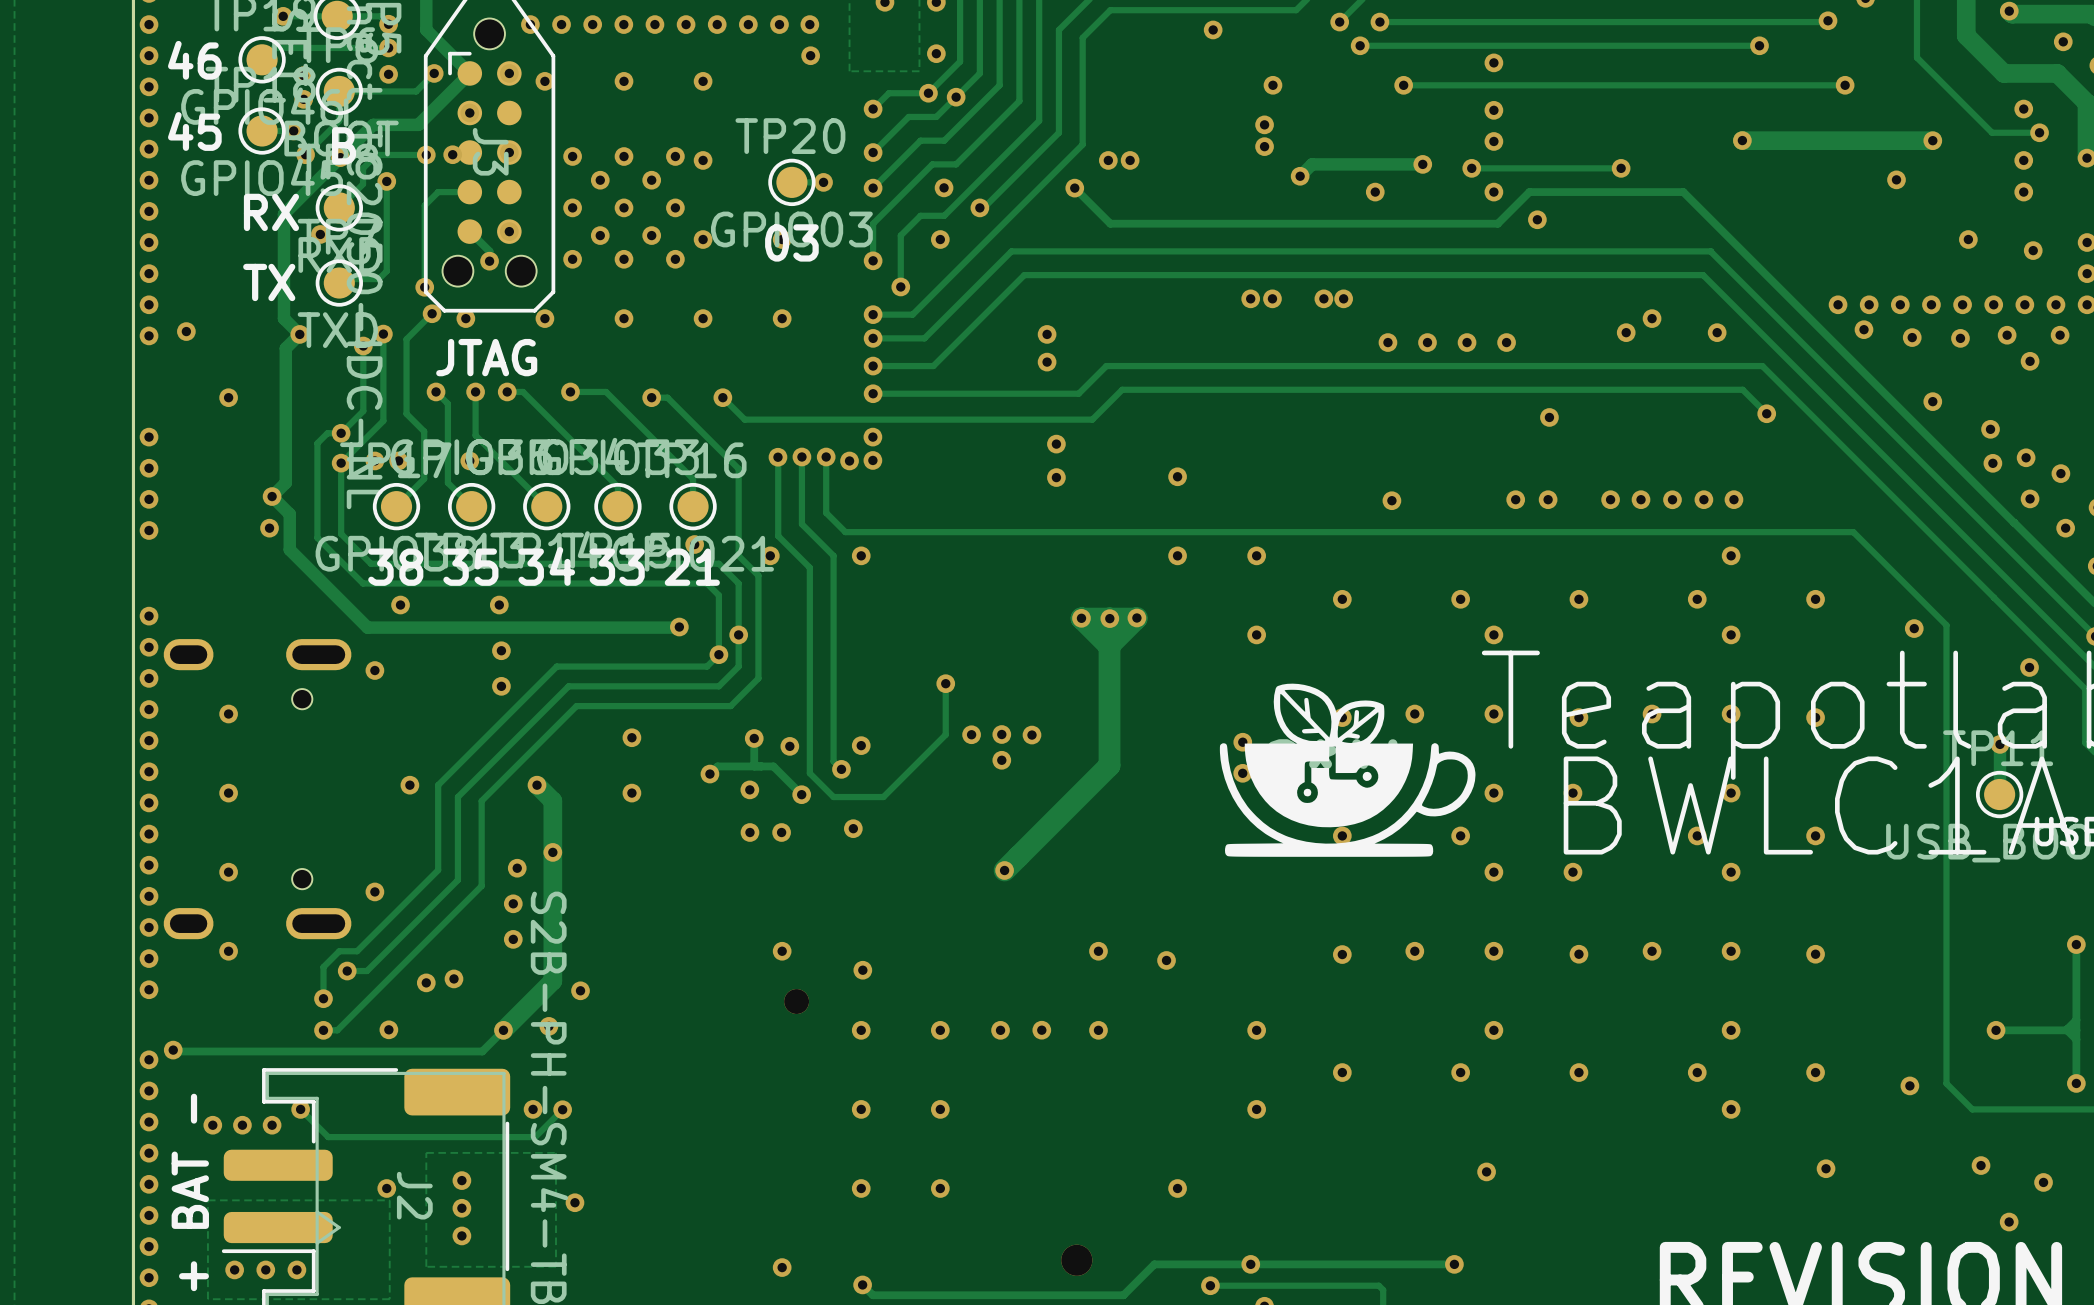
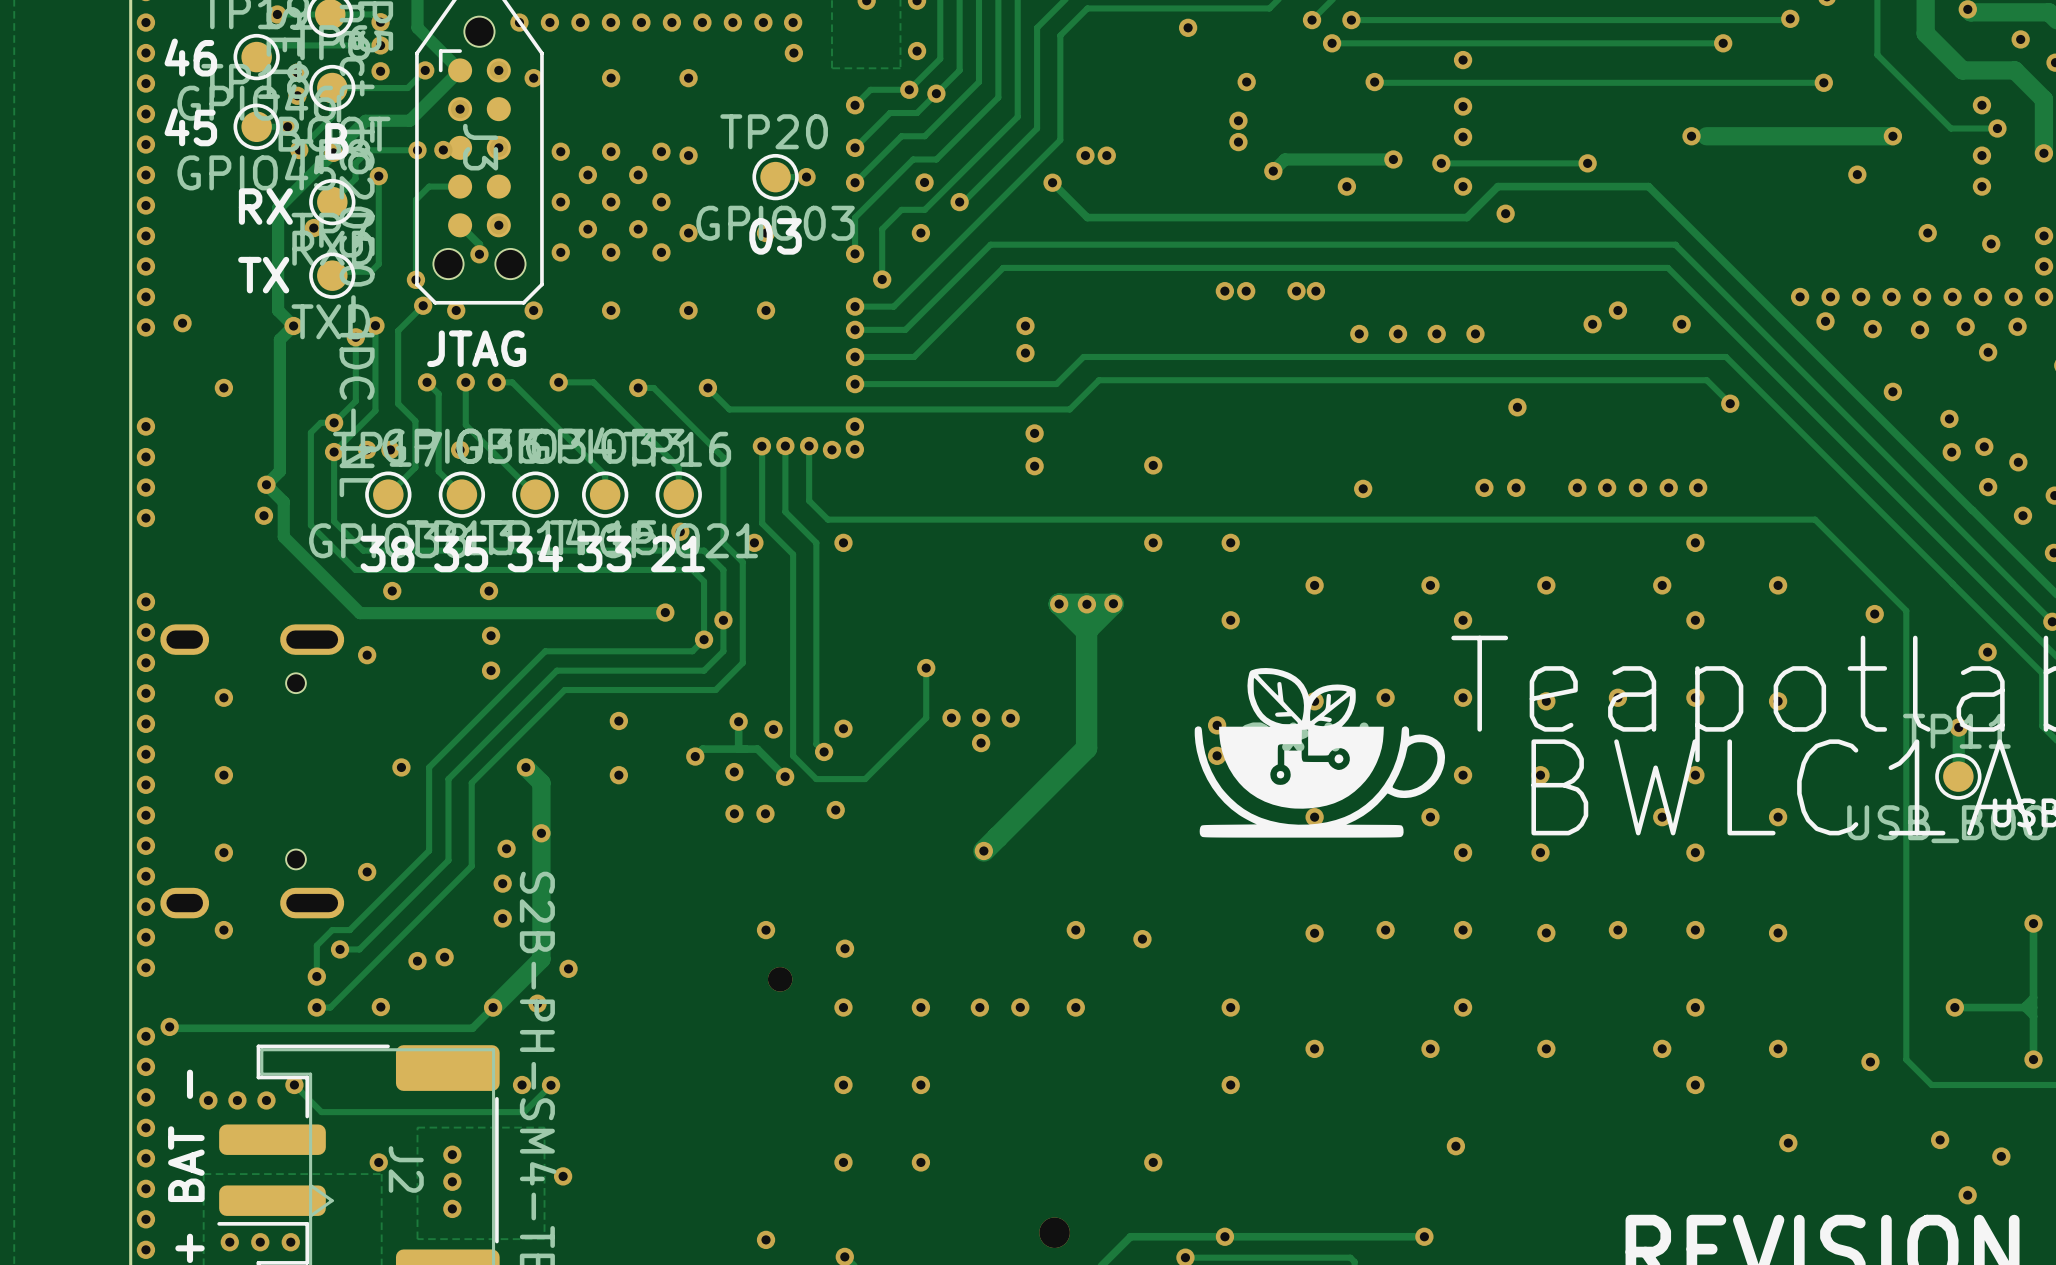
track: (1845, 85) (1403, 85) -> (1823, 82) (1375, 82)
via position: (1845, 85) -> (1823, 82)
via position: (1742, 140) -> (1691, 136)

